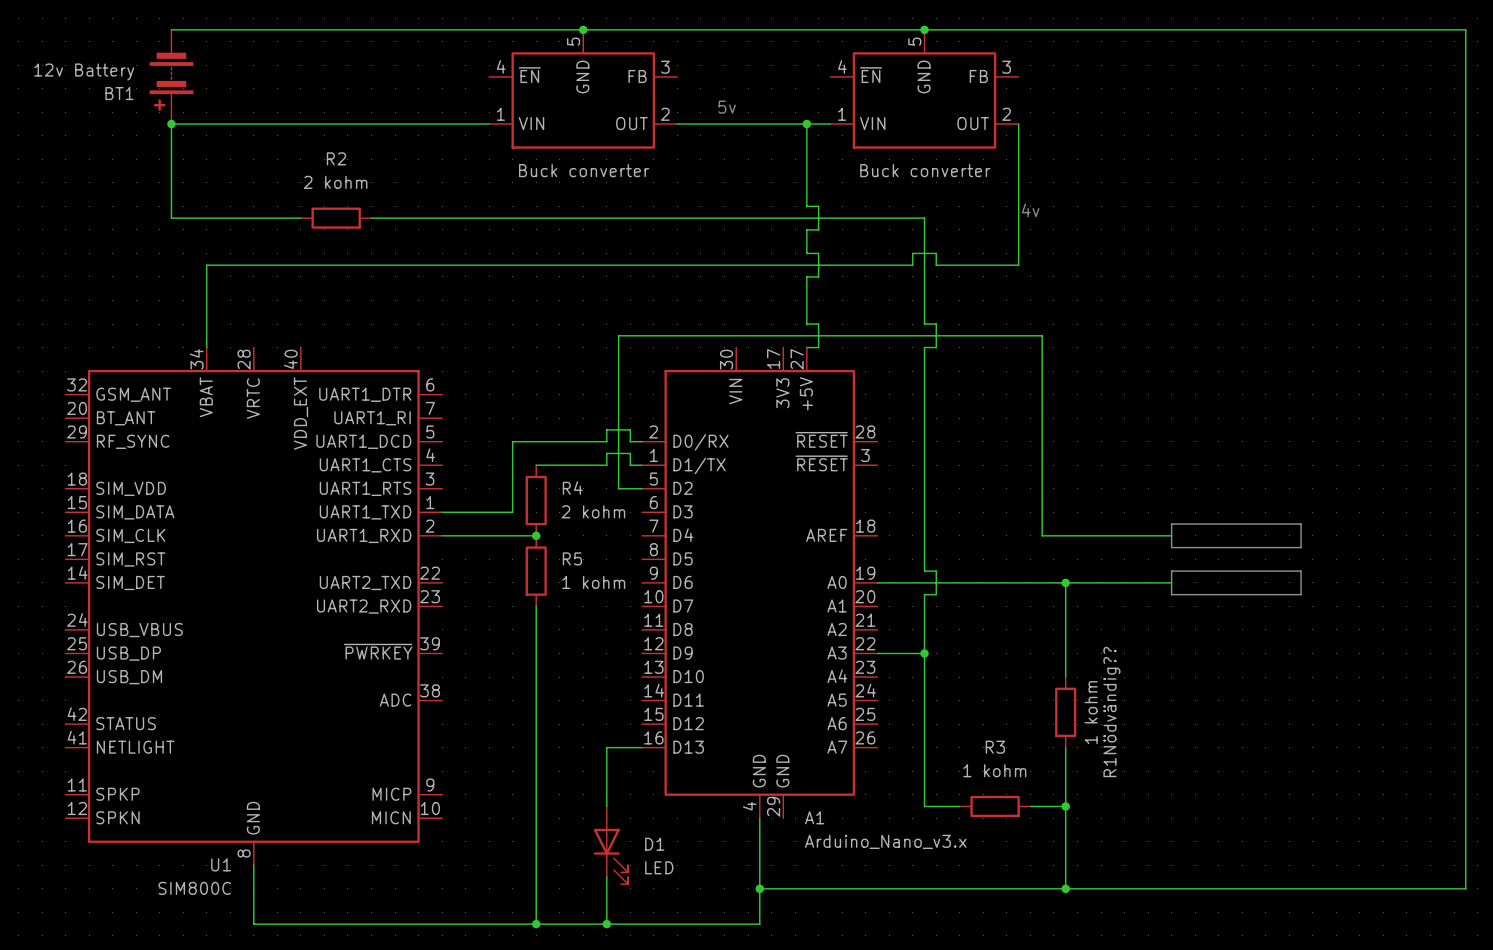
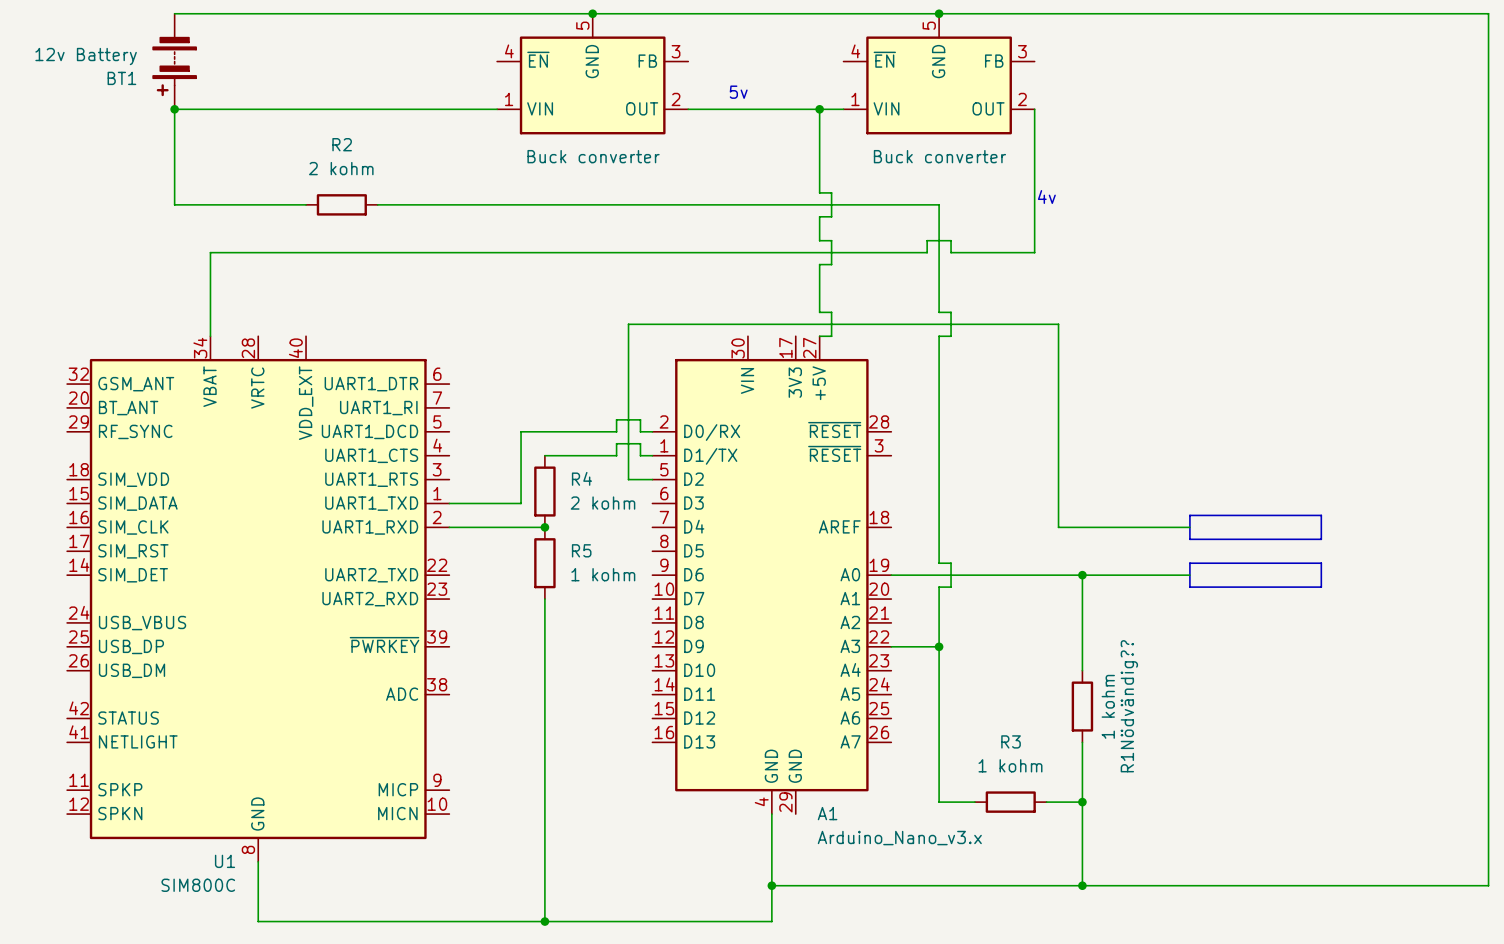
wire: (642, 747) (606, 747) (606, 806) -> none
D1: LED (610, 845) -> none
wire: (606, 877) (606, 924) -> none
junction: (606, 924) -> none

